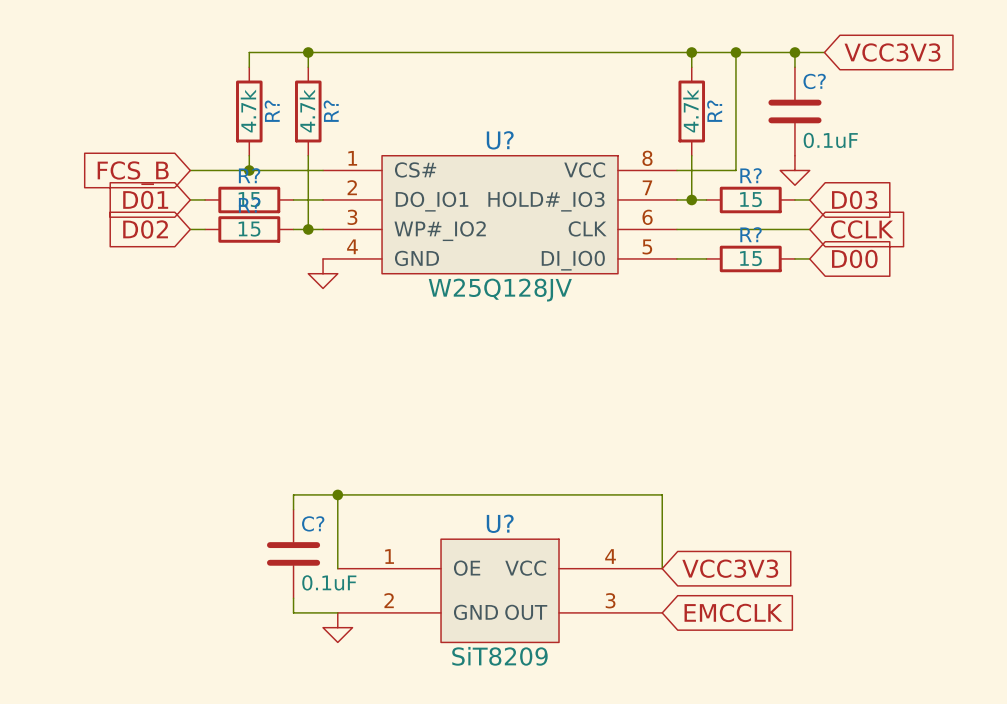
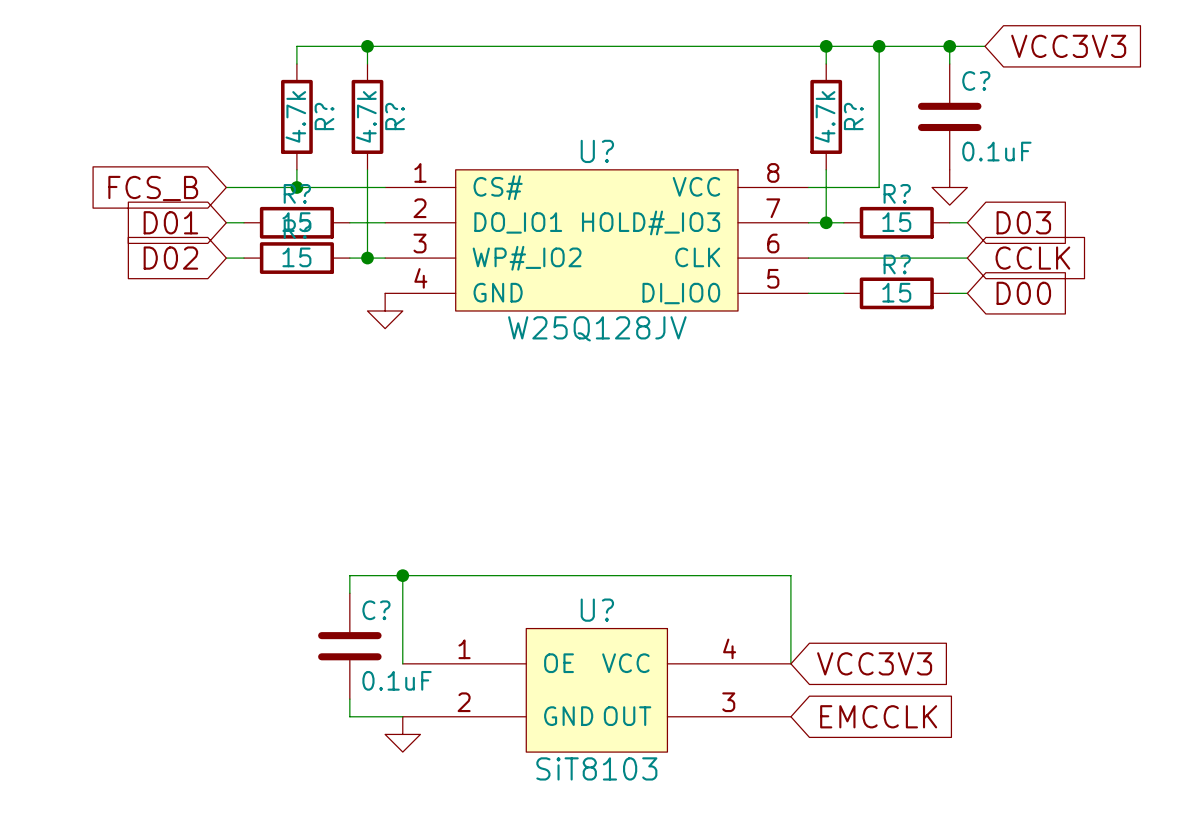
U? value: SiT8209 (499, 656) -> SiT8103 (596, 768)

